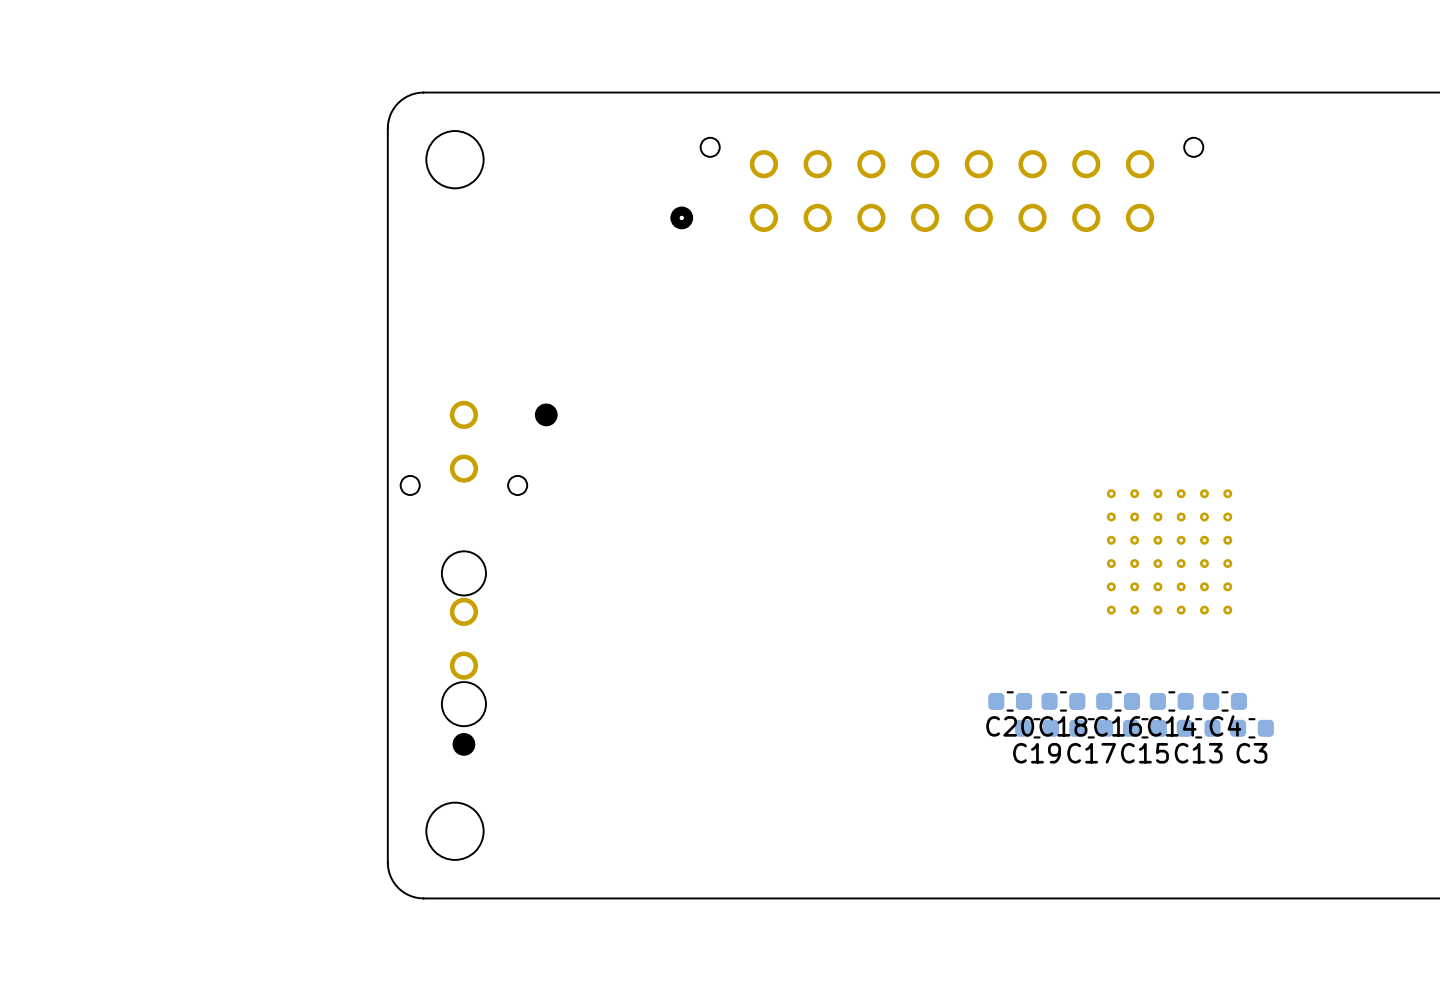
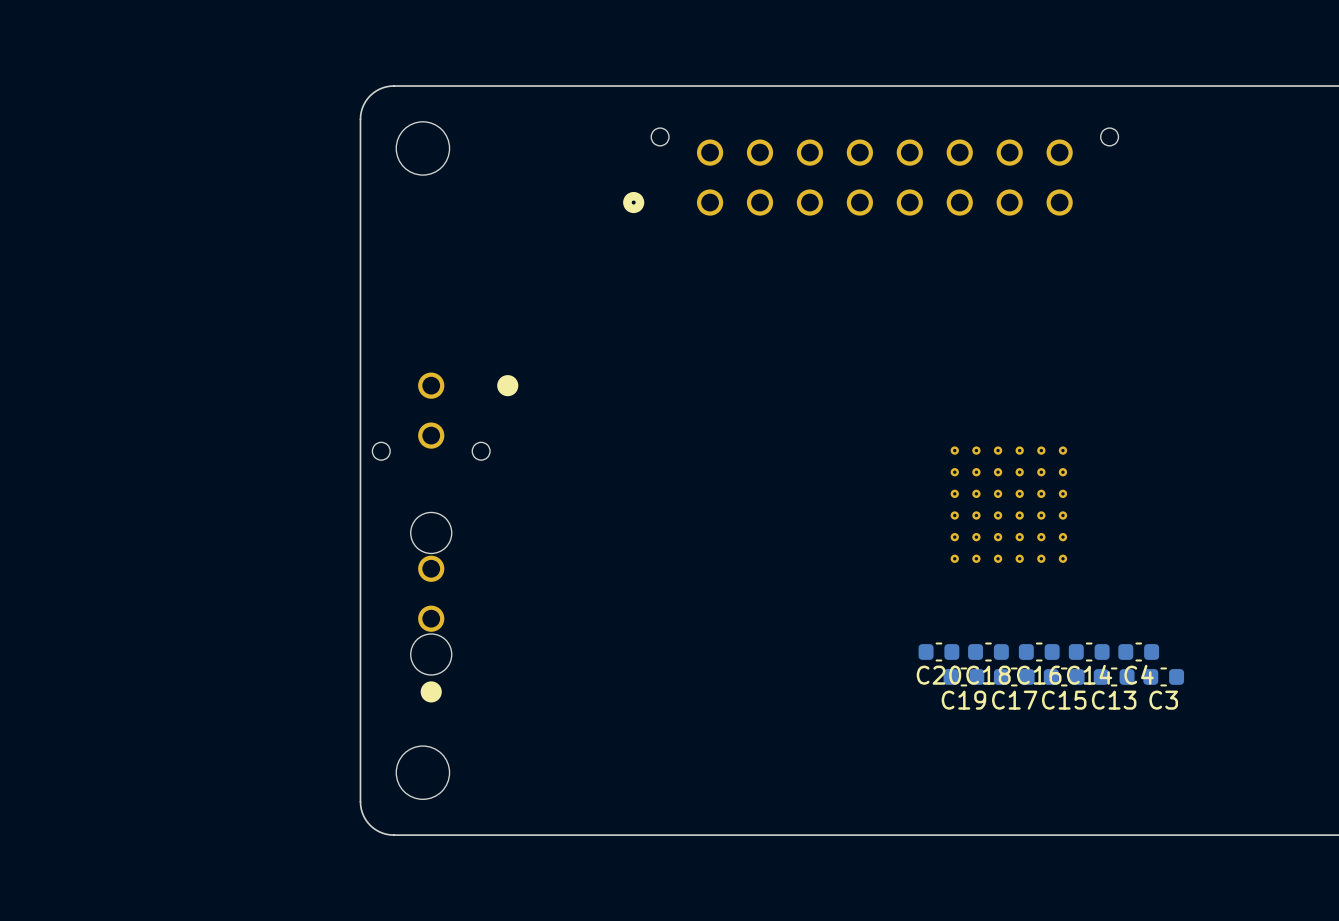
part position: (1169, 551) -> (1008, 504)

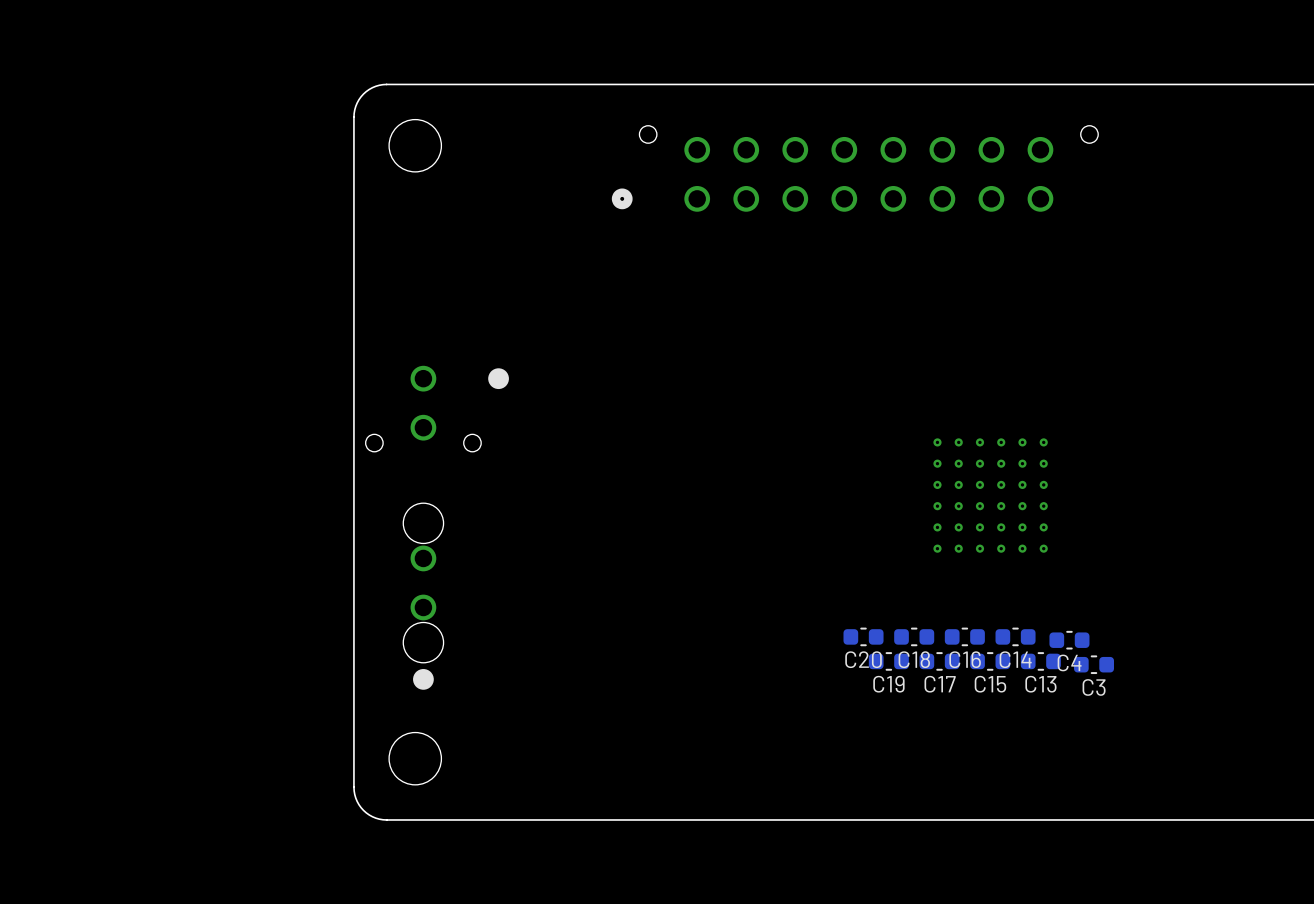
C14: none -> (1015, 636)
C20 position: (938, 651) -> (863, 636)
C18 position: (988, 651) -> (914, 636)
C16 position: (1039, 651) -> (964, 636)
C4: (1138, 651) -> none
C13: none -> (1040, 661)
C14 name: C14 (1089, 674) -> C4 (1069, 662)
C19 position: (963, 676) -> (888, 661)
C17 position: (1014, 676) -> (939, 661)
C15 position: (1064, 676) -> (990, 661)
C3: (1163, 676) -> none
C13 name: C13 (1114, 700) -> C3 (1094, 687)

